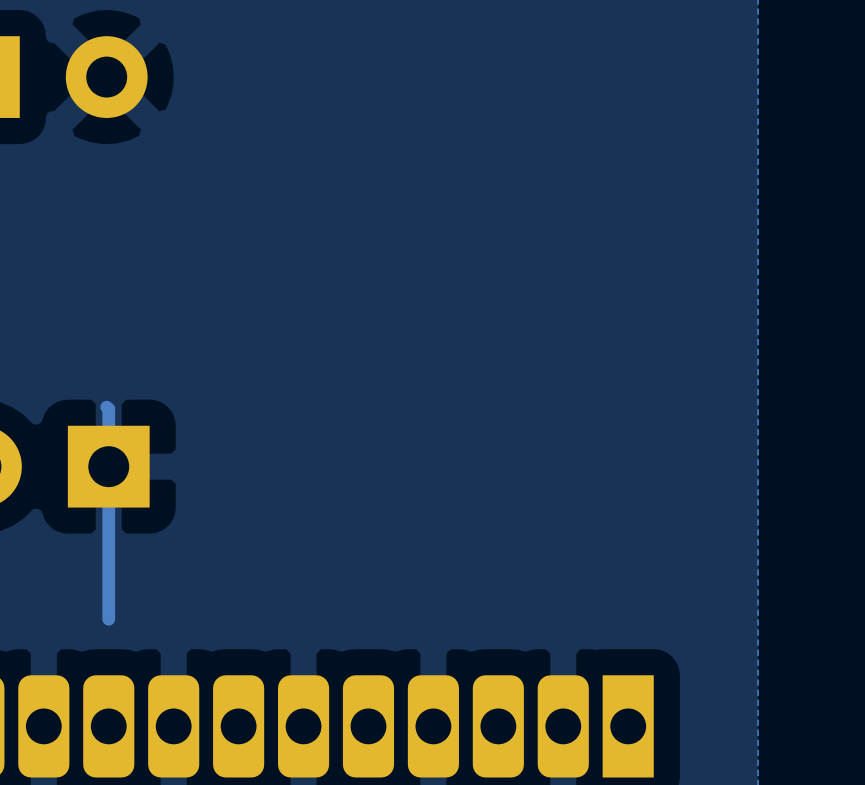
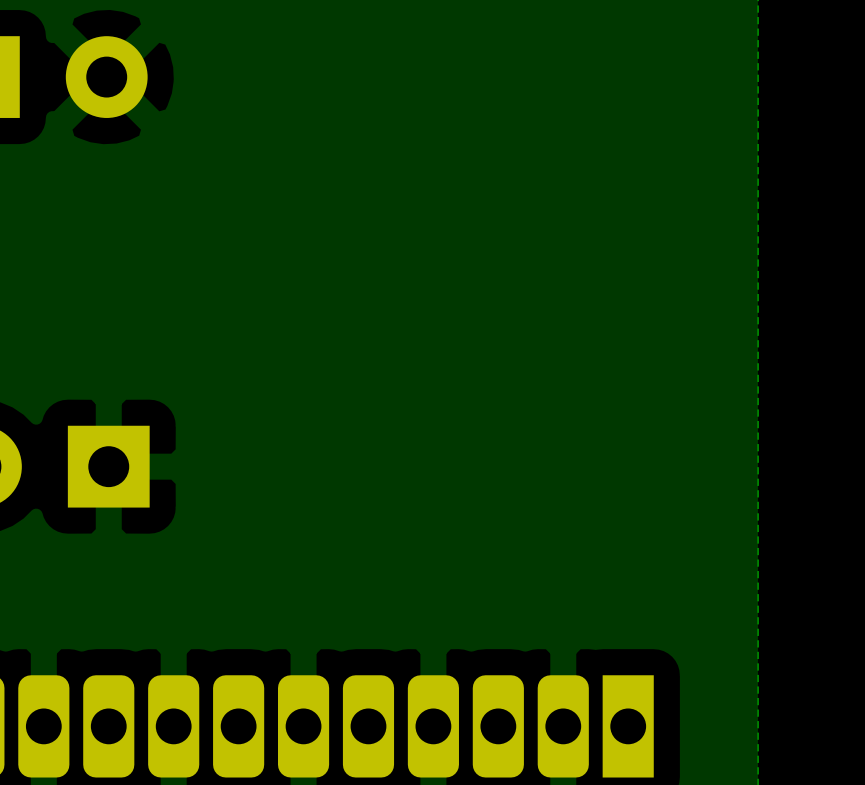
track: (106, 407) (108, 409) (108, 619) -> none

